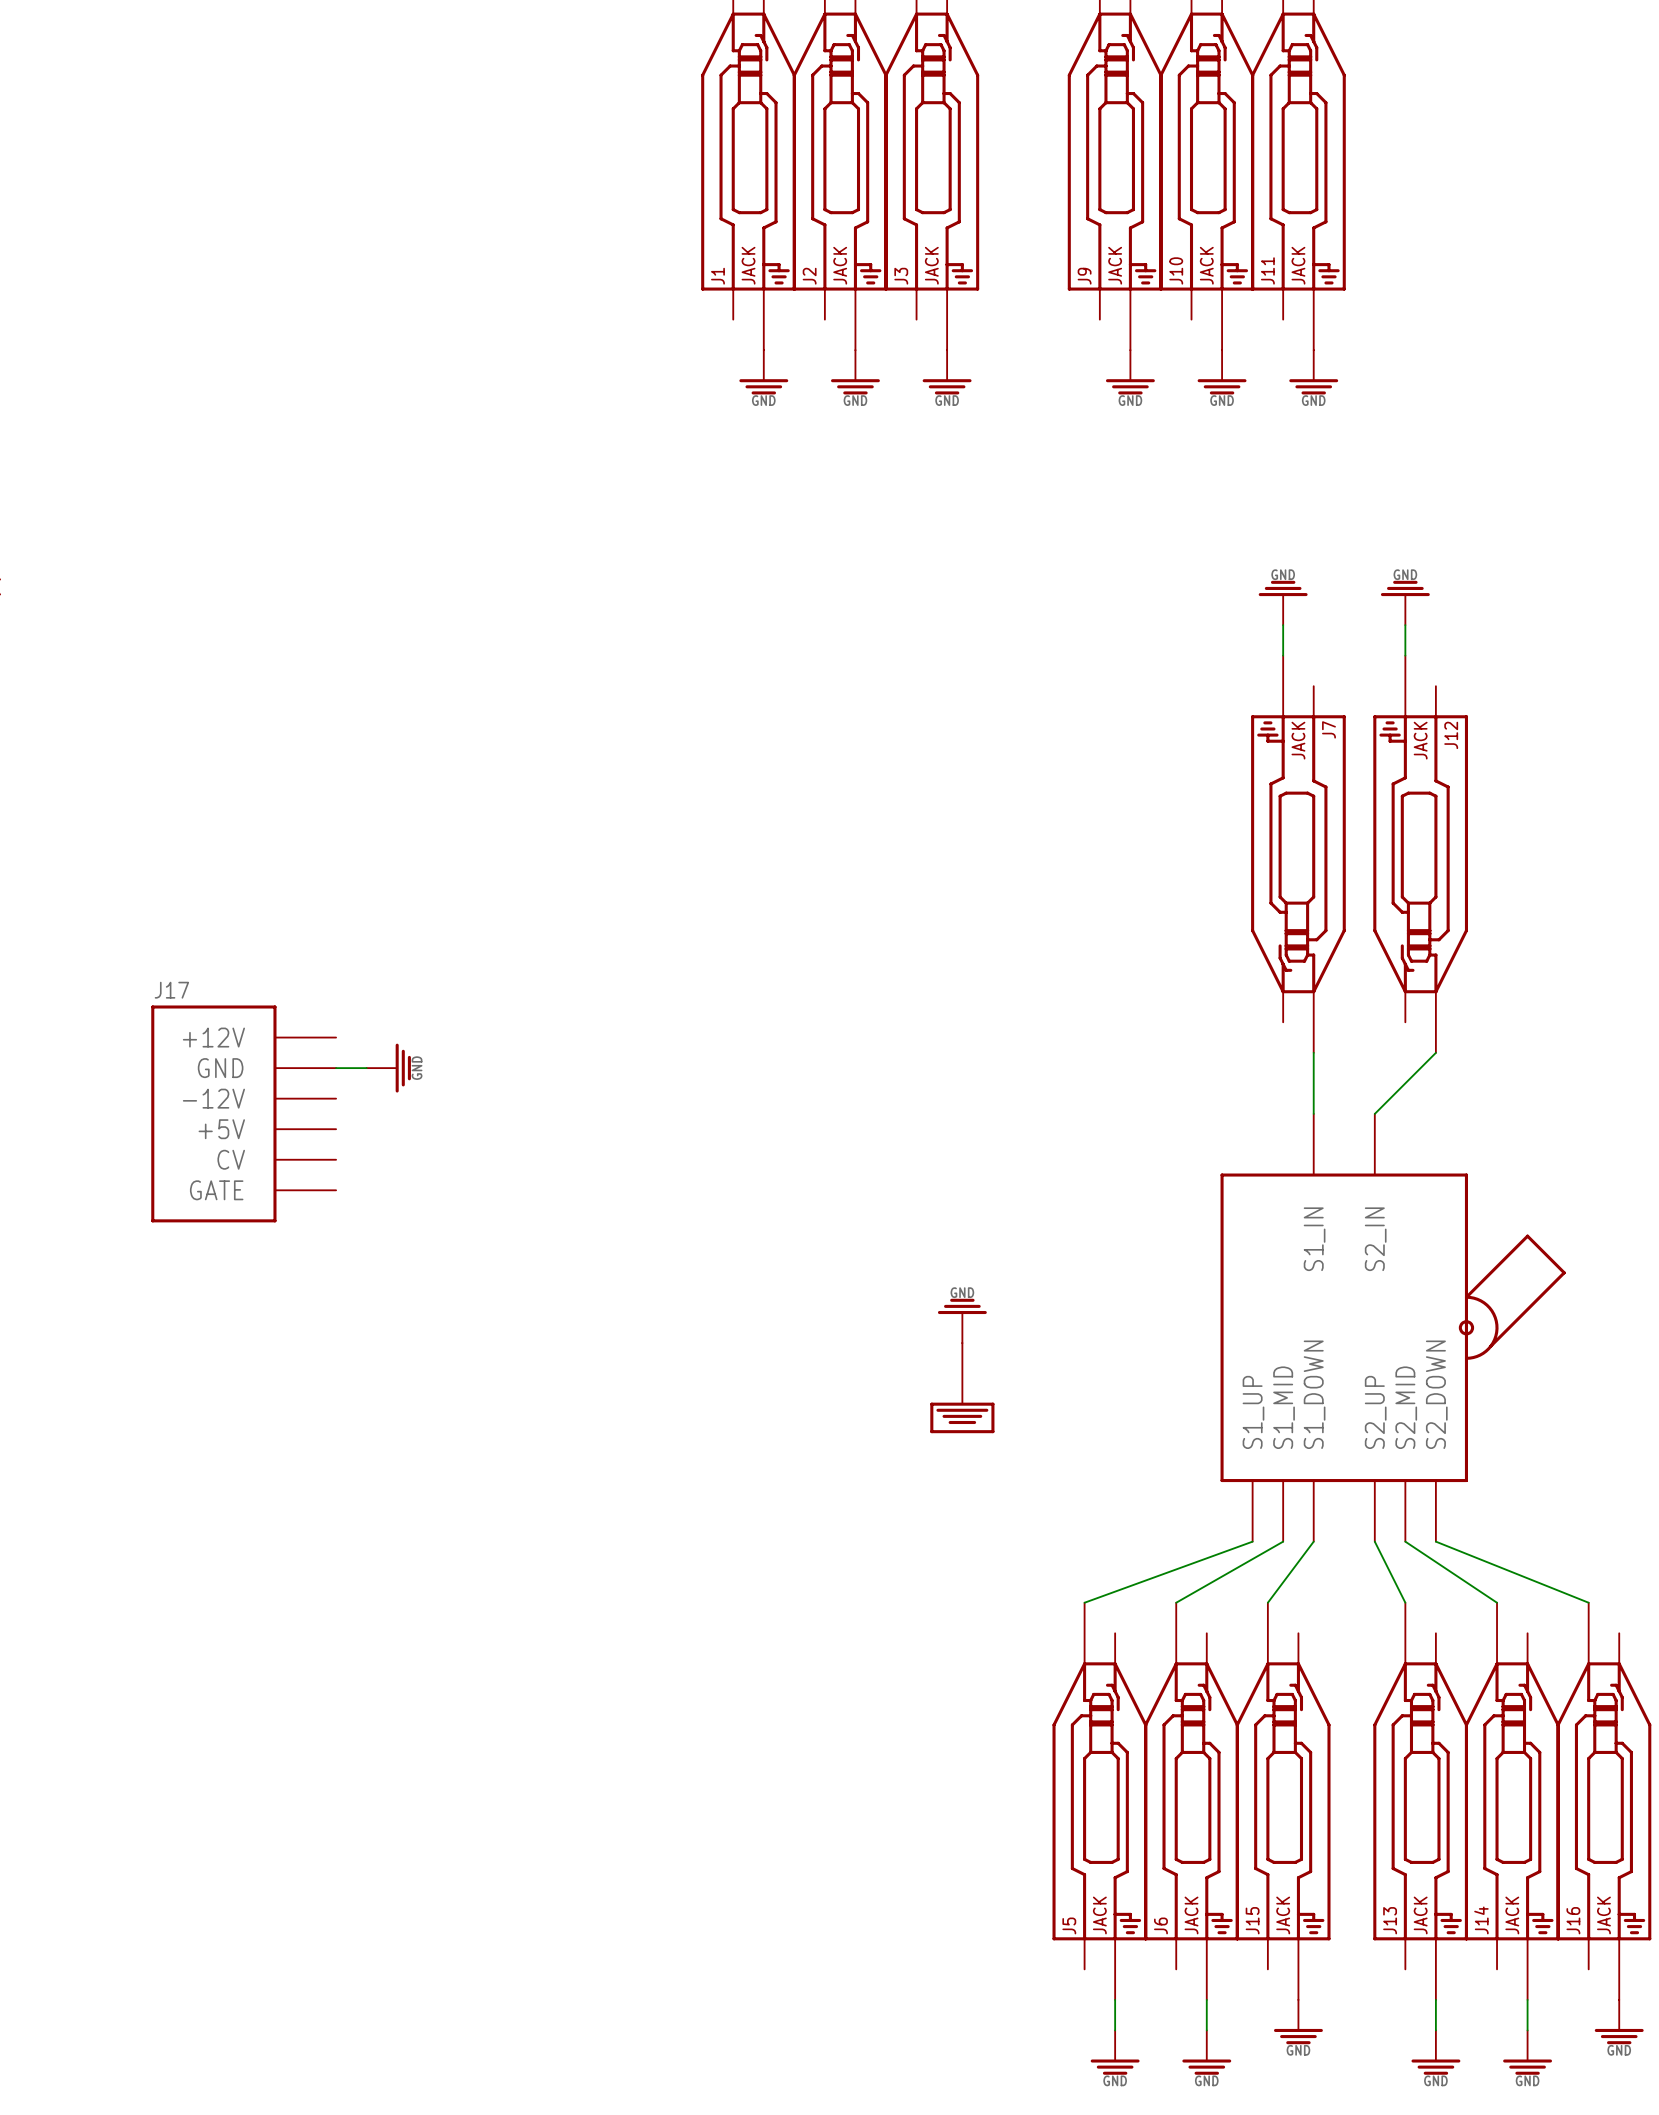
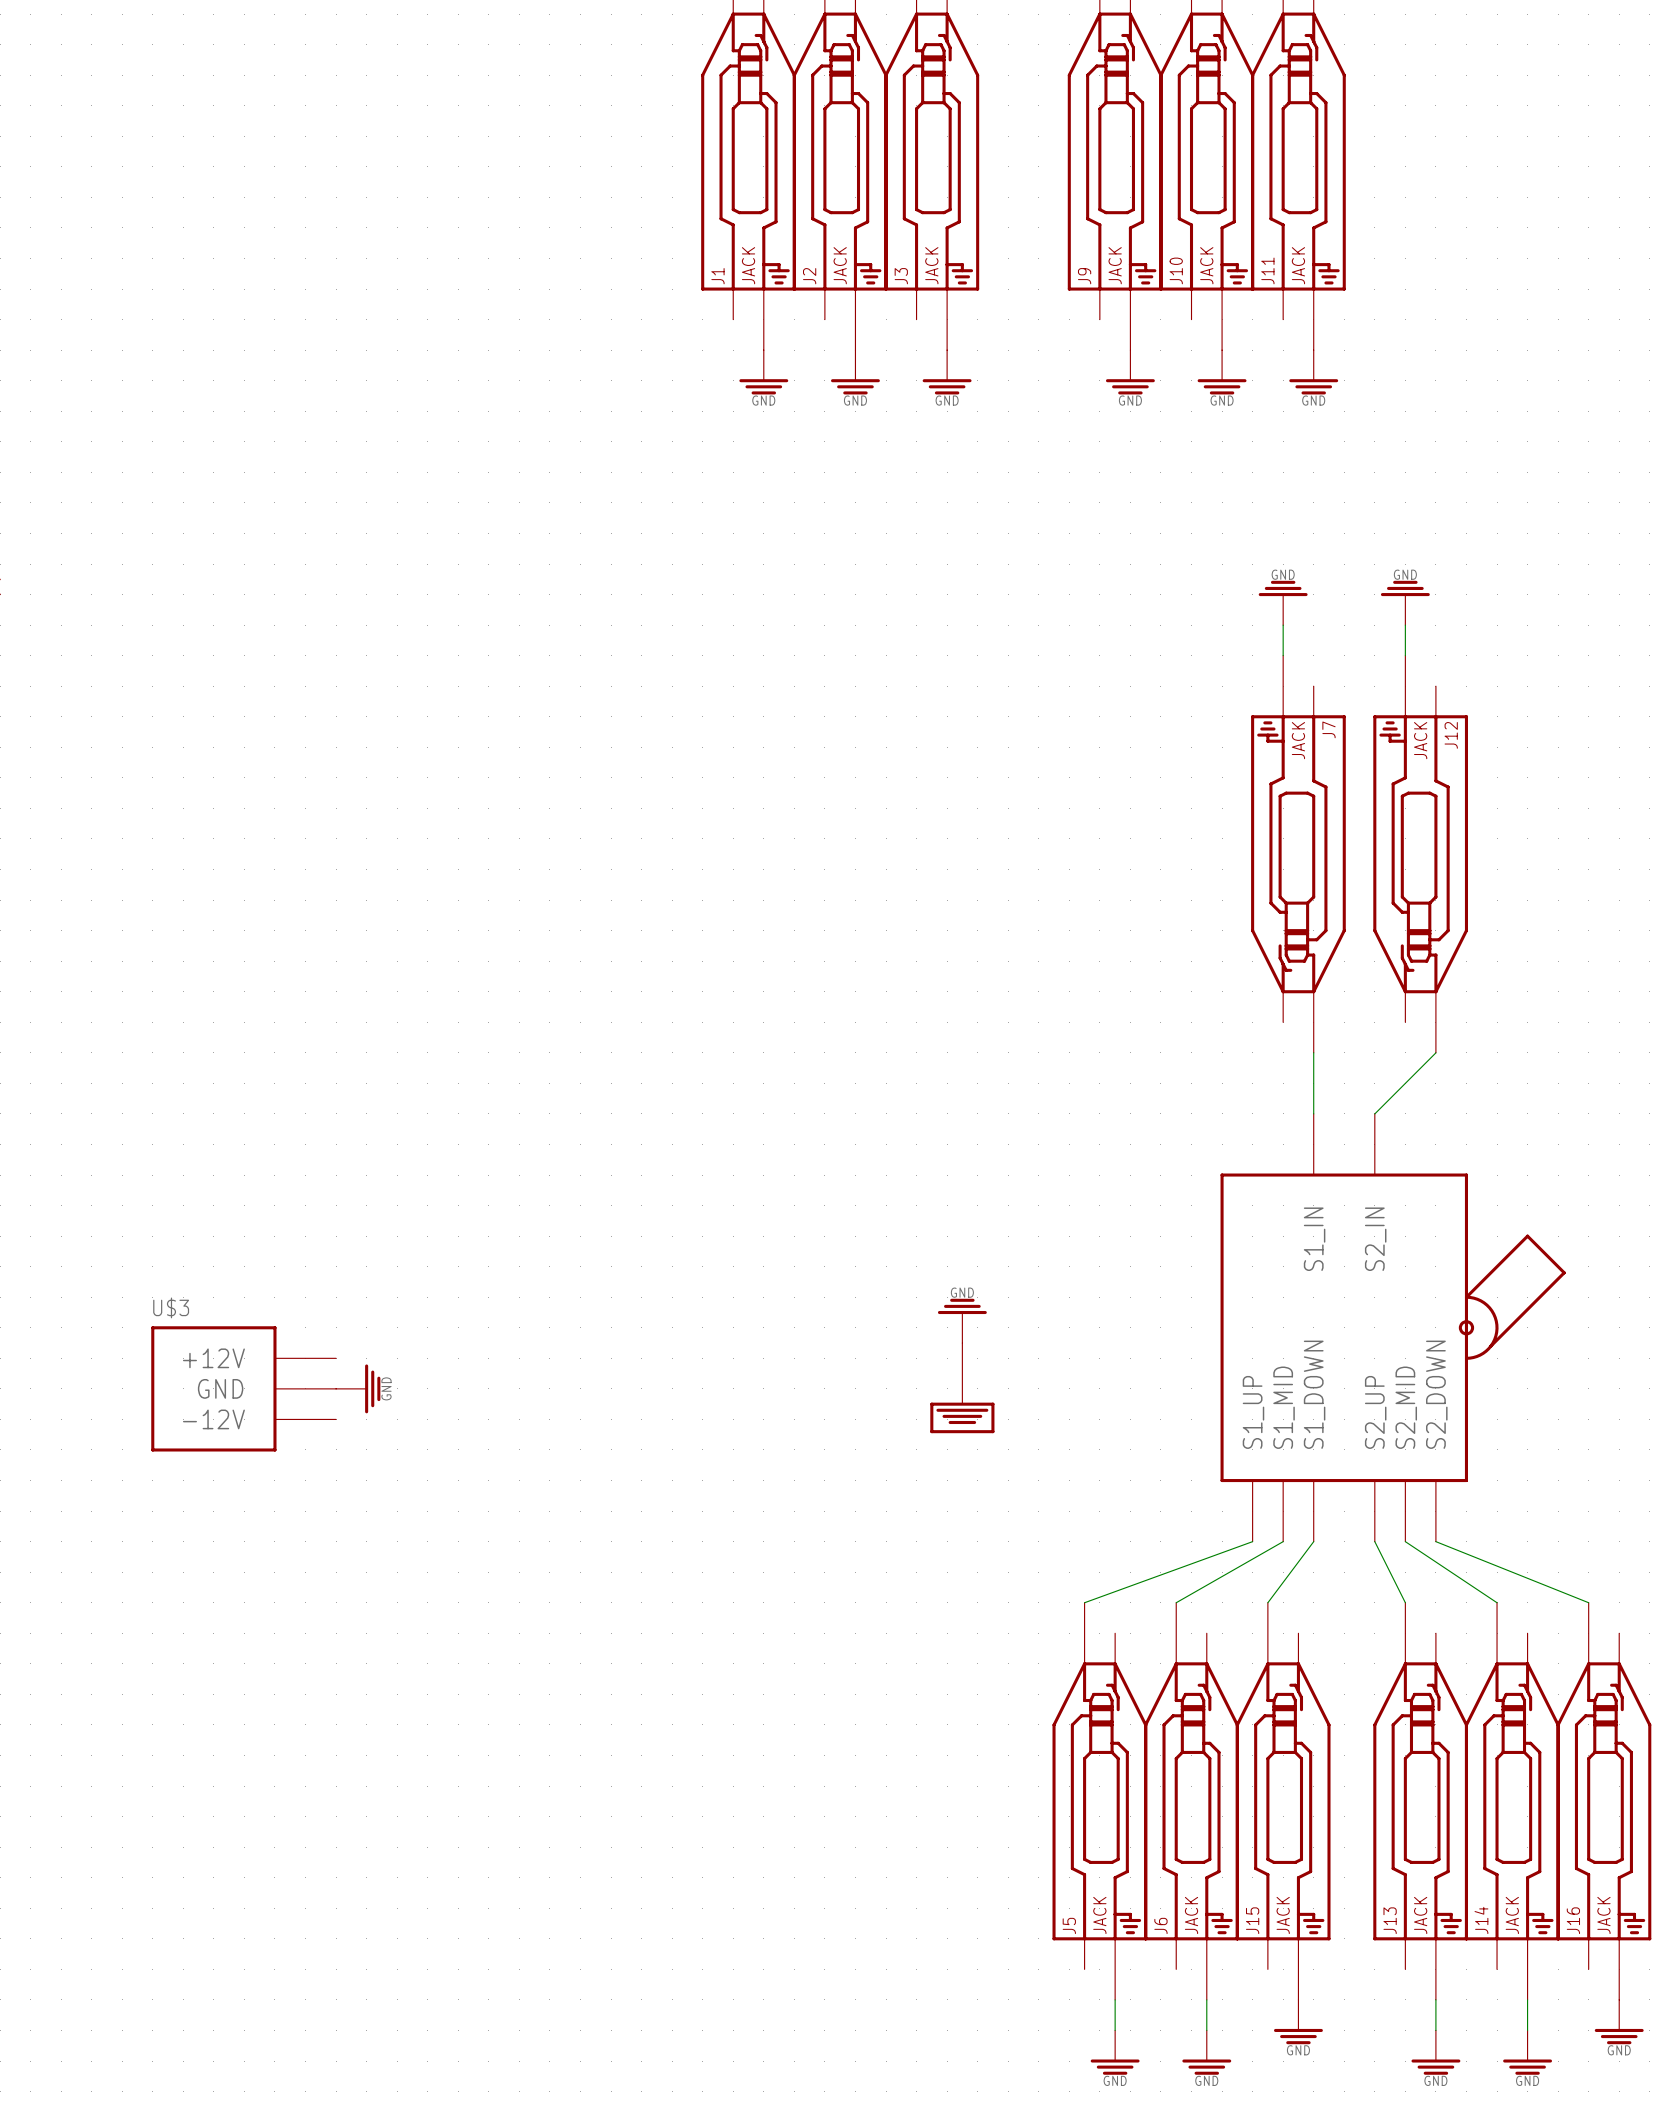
wire: (336, 1068) (366, 1068) -> none
power symbol: GND (388, 1068) -> none
J17: (243, 1113) -> none
U$3: none -> (243, 1388)
power symbol: none -> GND (358, 1388)

